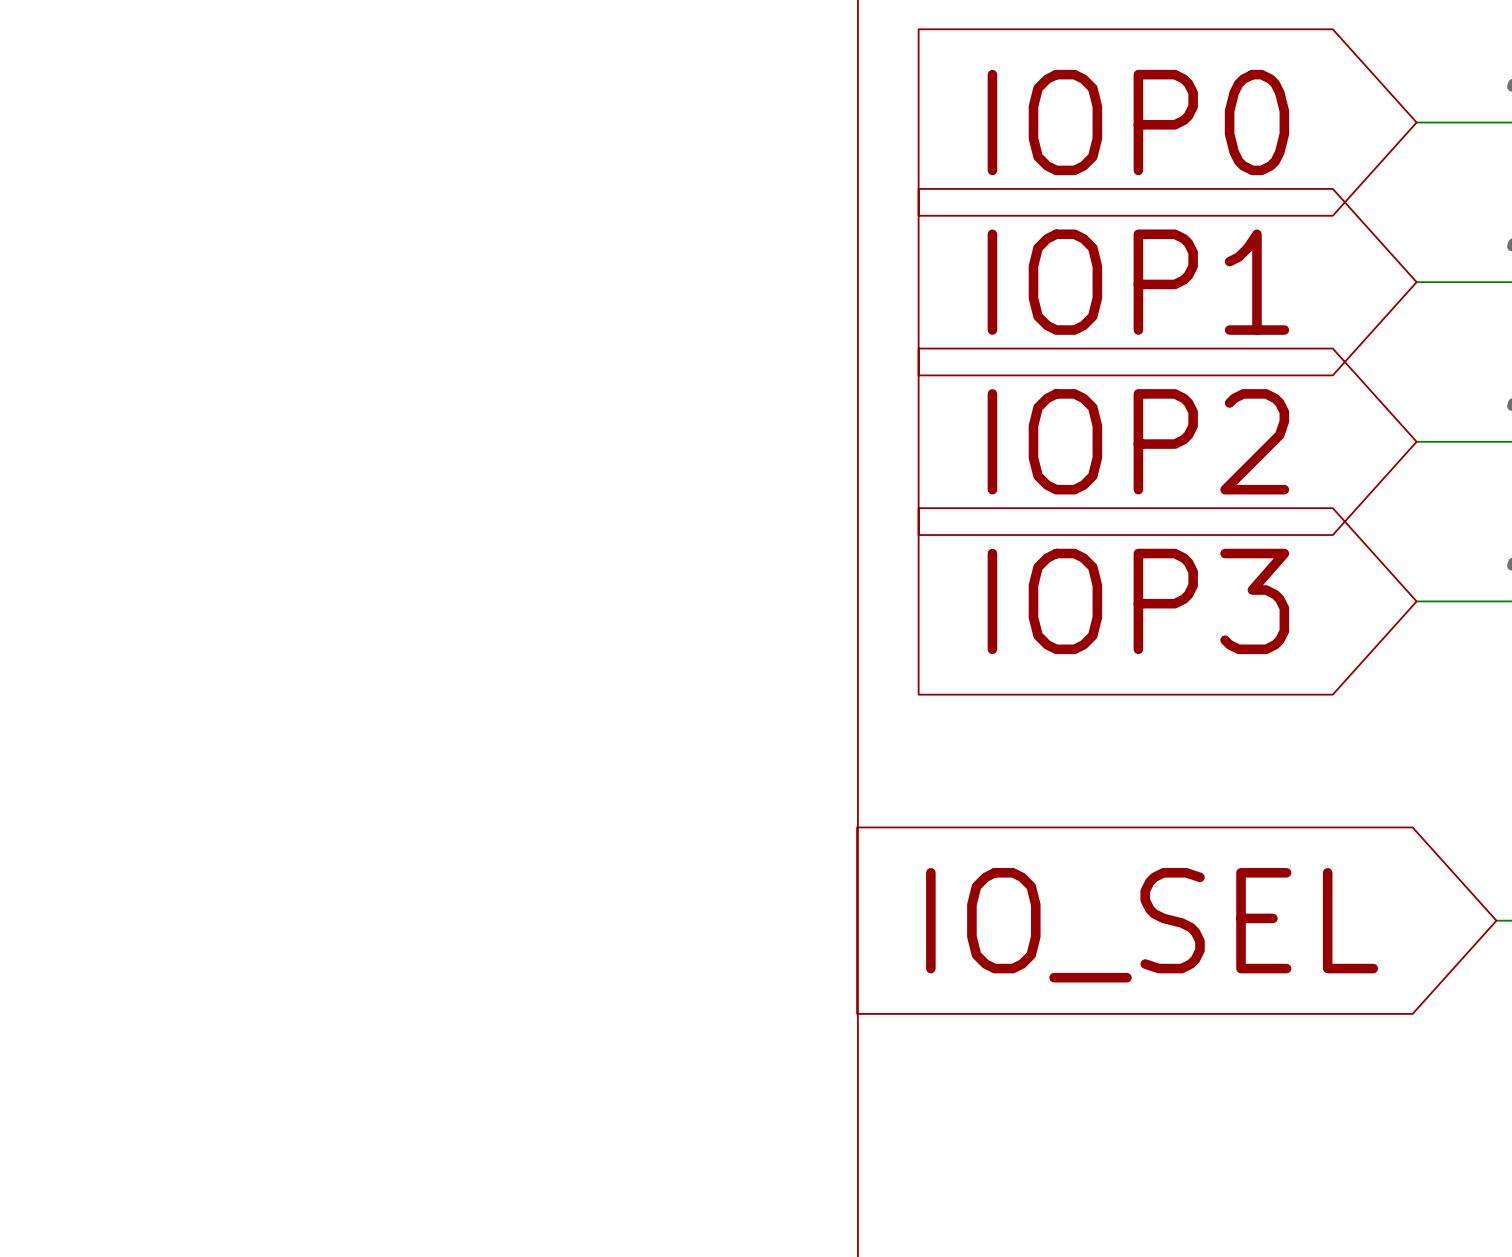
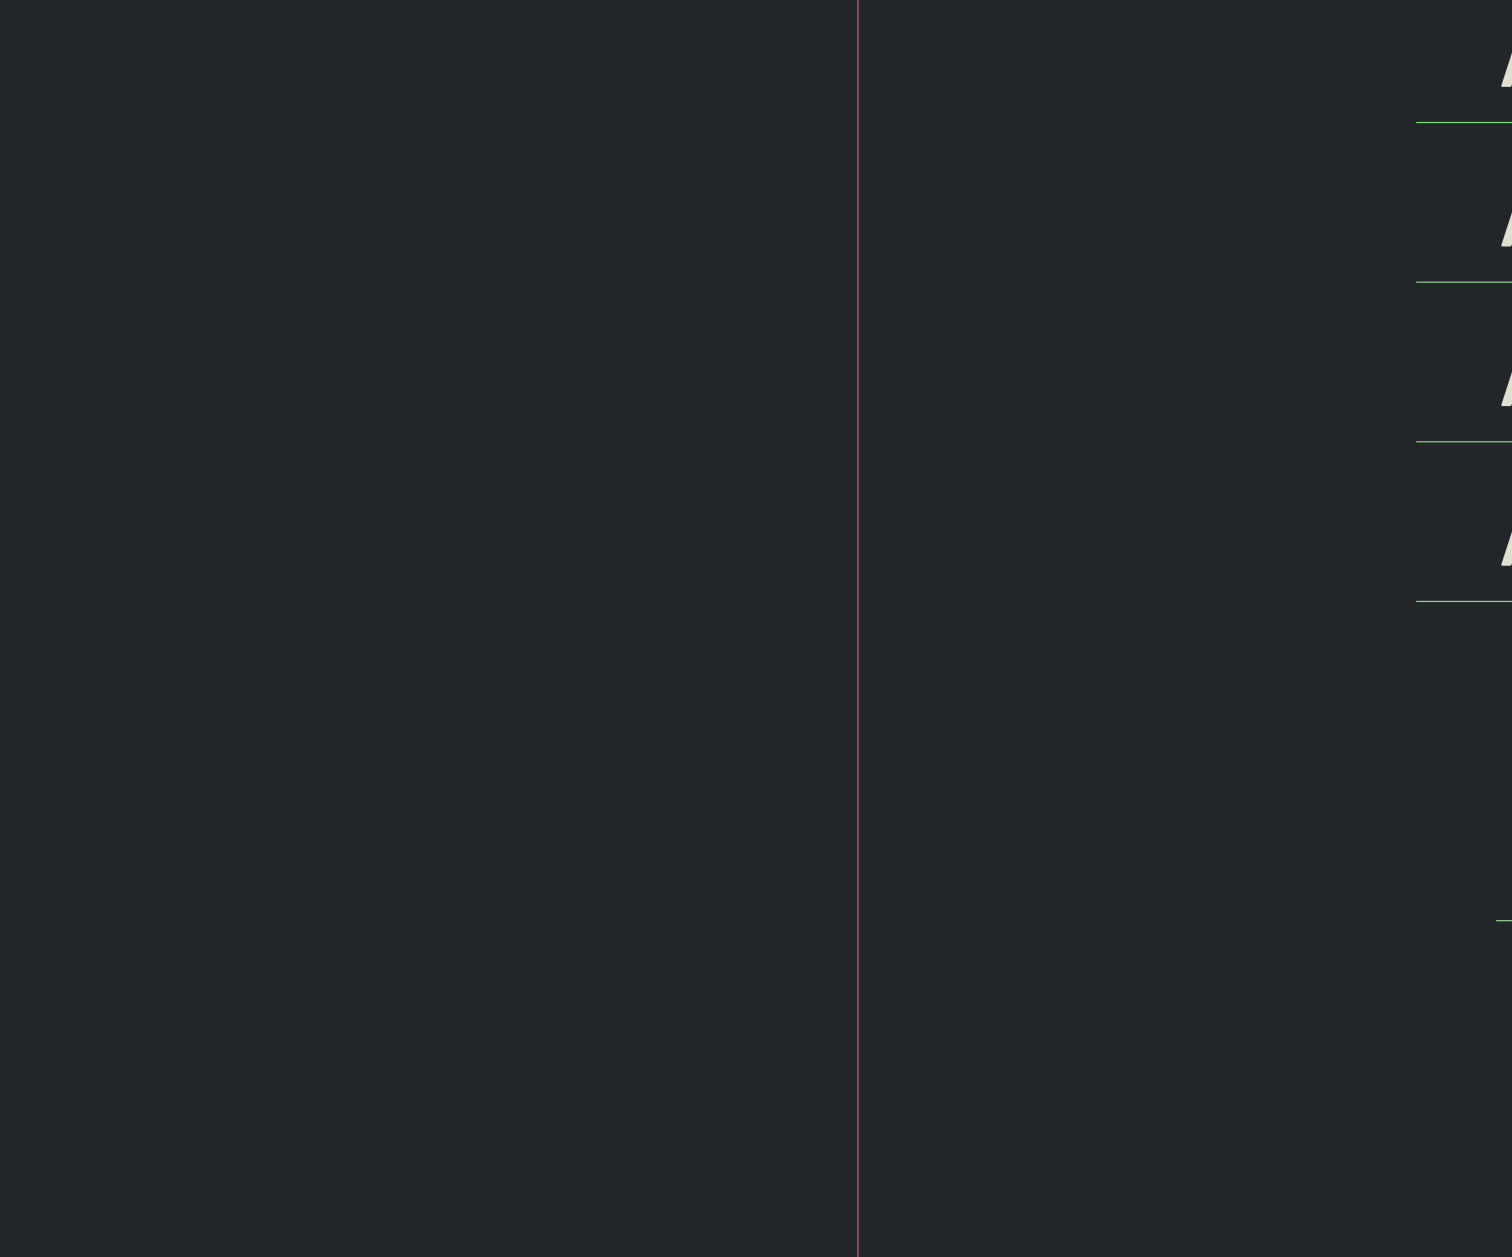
global label: IOP0 (1138, 122) -> none
global label: IOP1 (1138, 282) -> none
global label: IOP2 (1138, 441) -> none
global label: IOP3 (1138, 601) -> none
global label: IO_SEL (1152, 925) -> none

